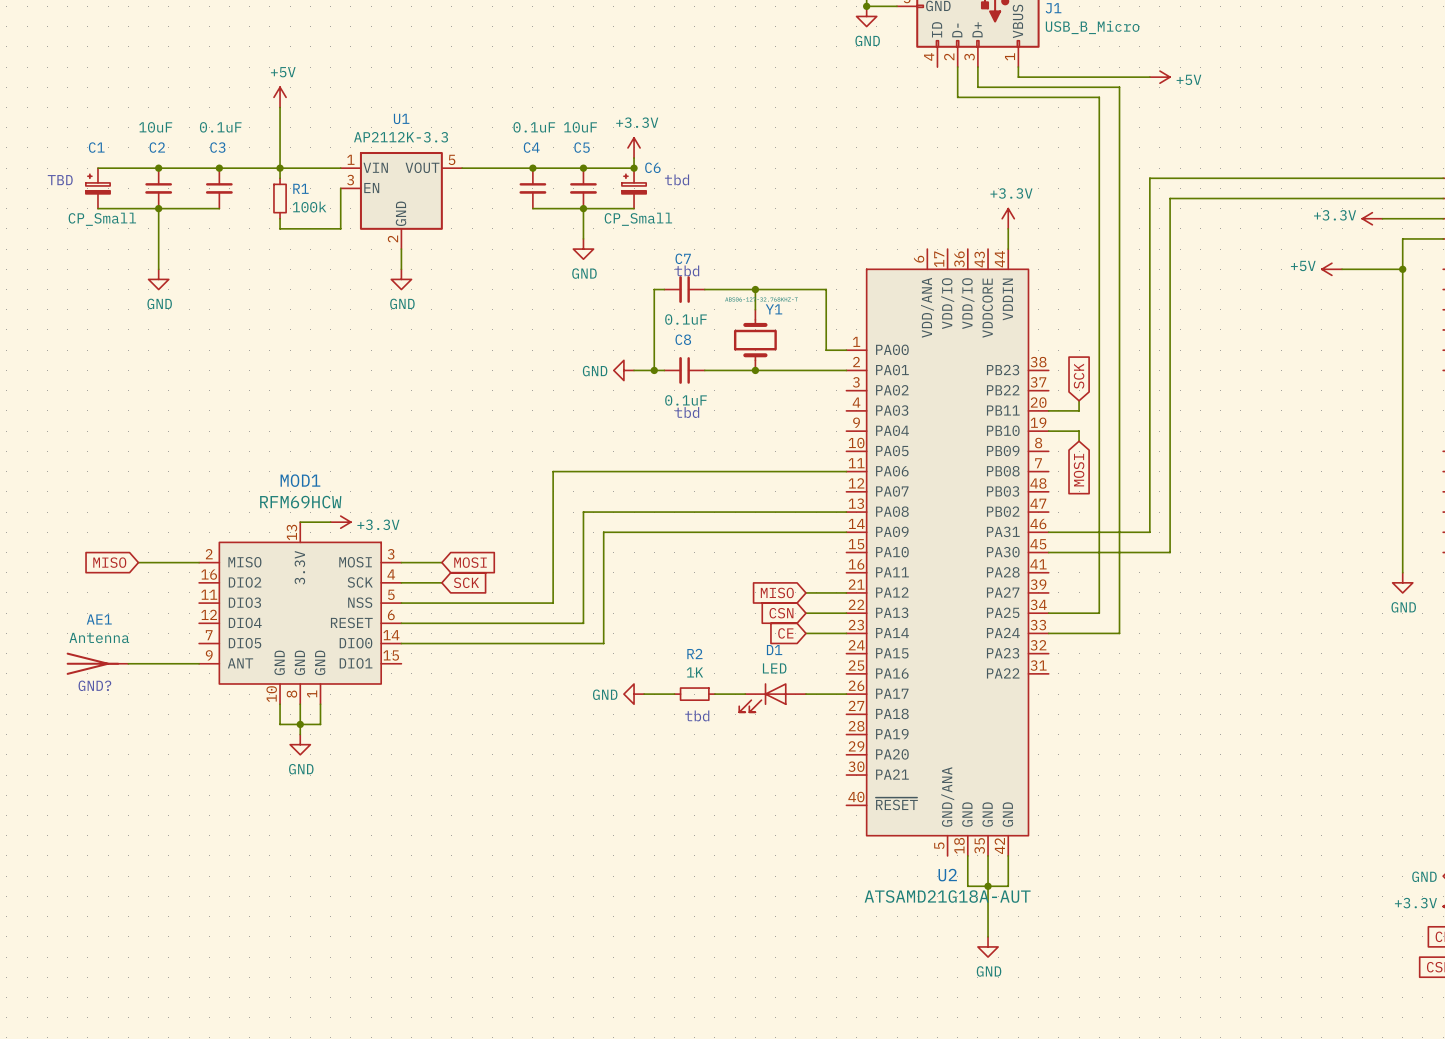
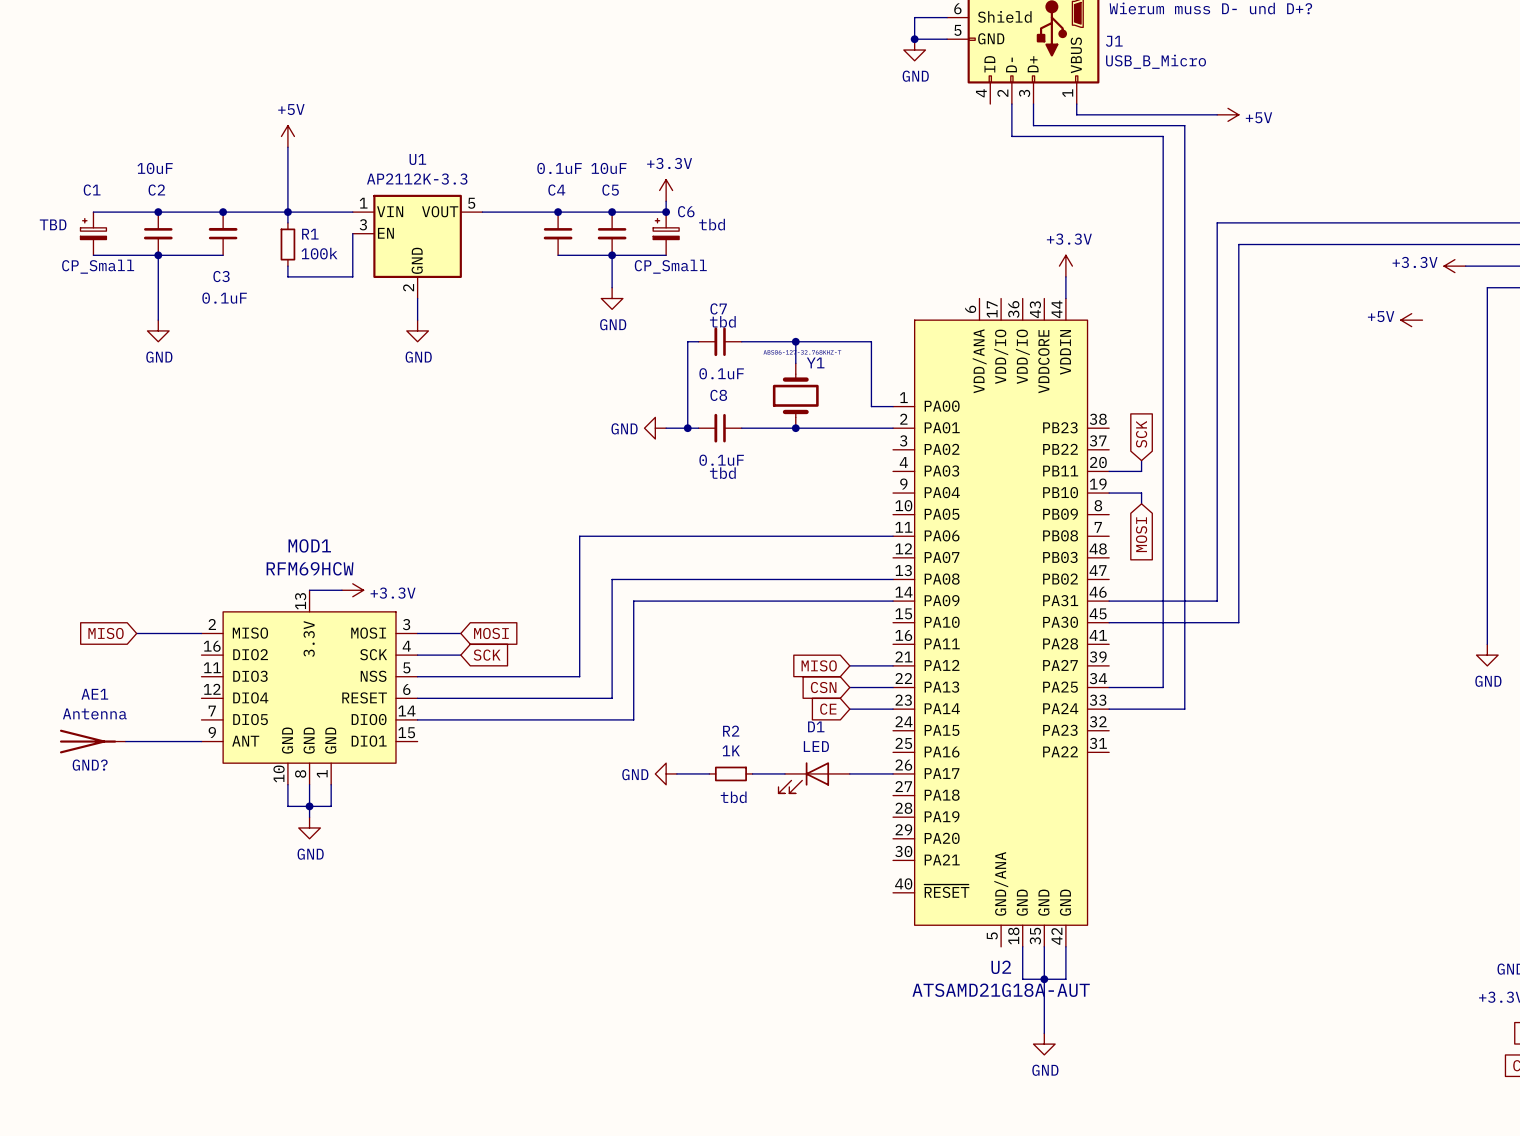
C3 rotation: 0° (219, 188) -> 180° (223, 233)
wire: (1342, 269) (1402, 269) -> none
junction: (1402, 269) -> none

